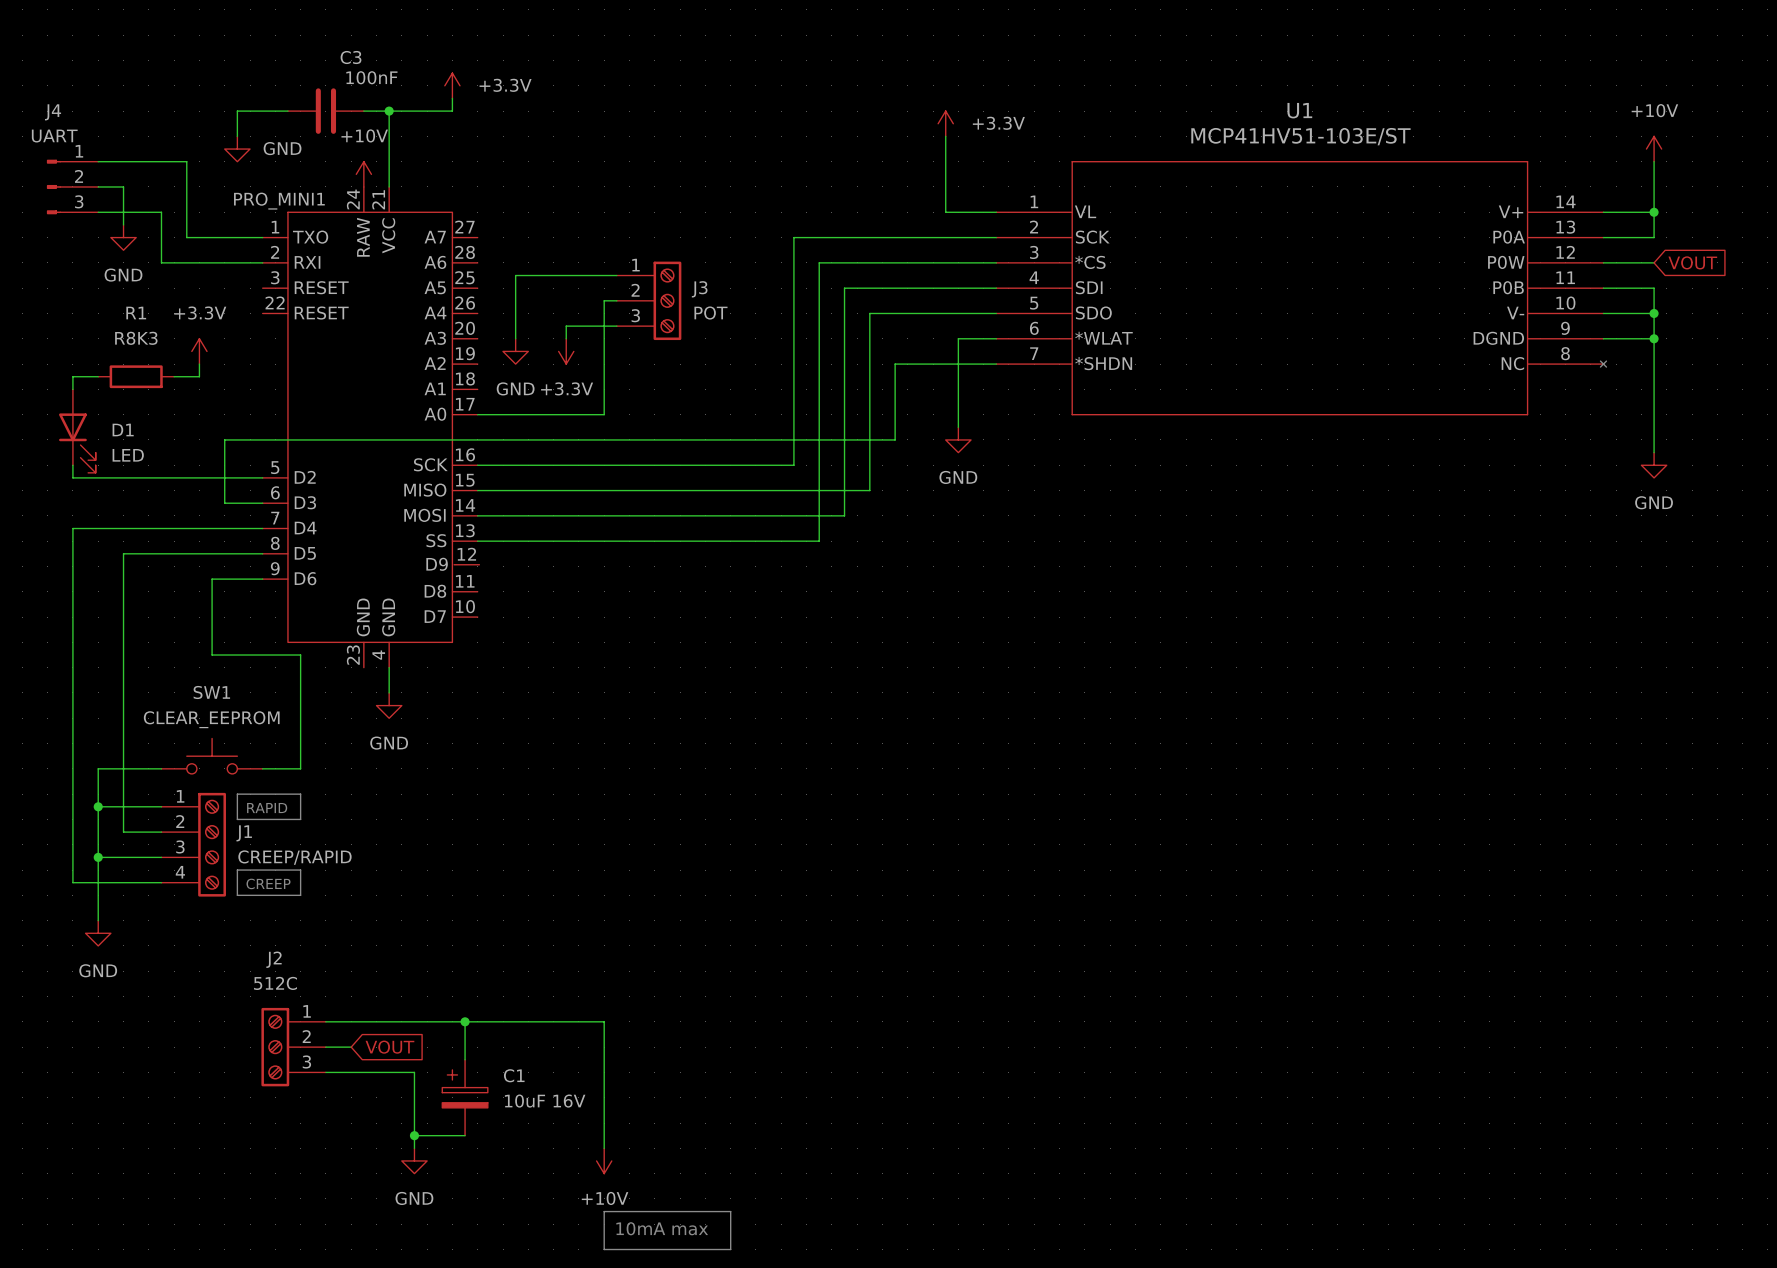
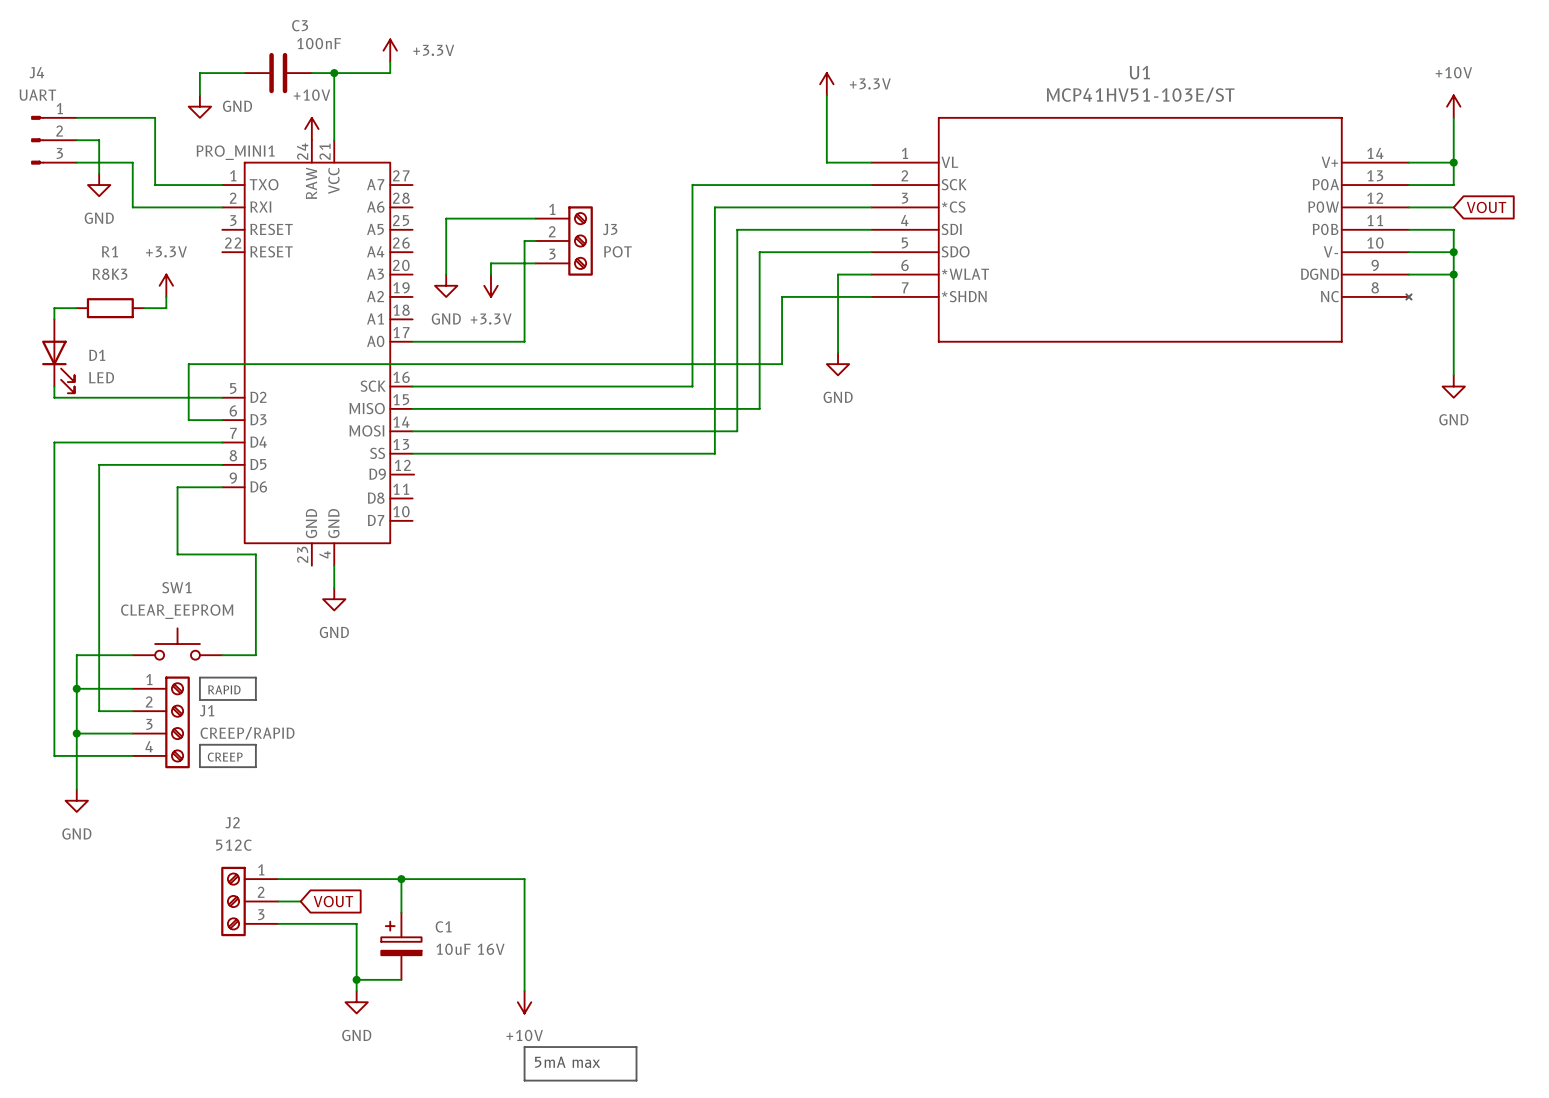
text: 10mA max (662, 1228) -> 5mA max (567, 1062)

